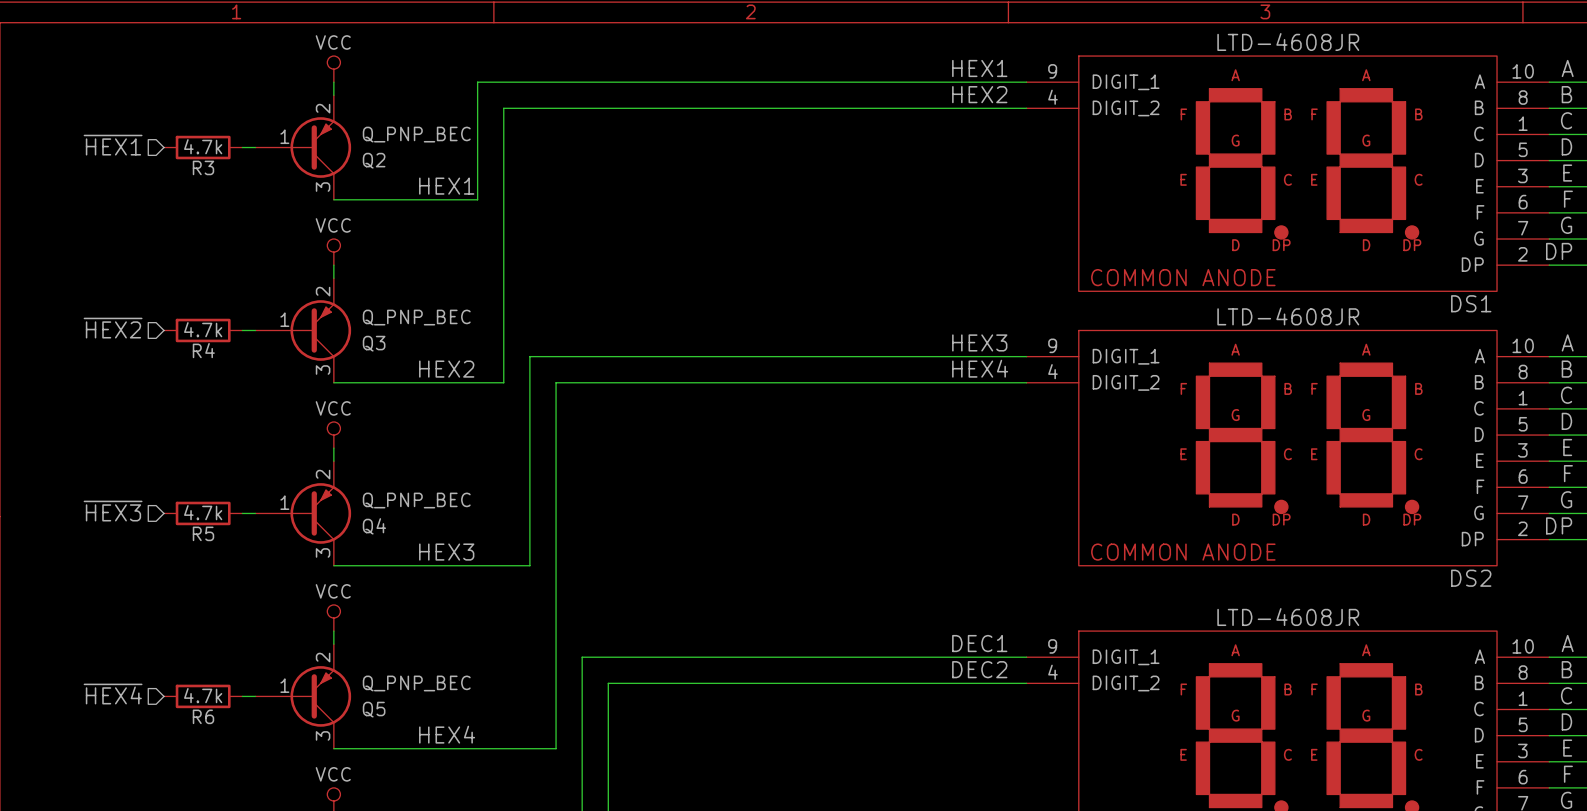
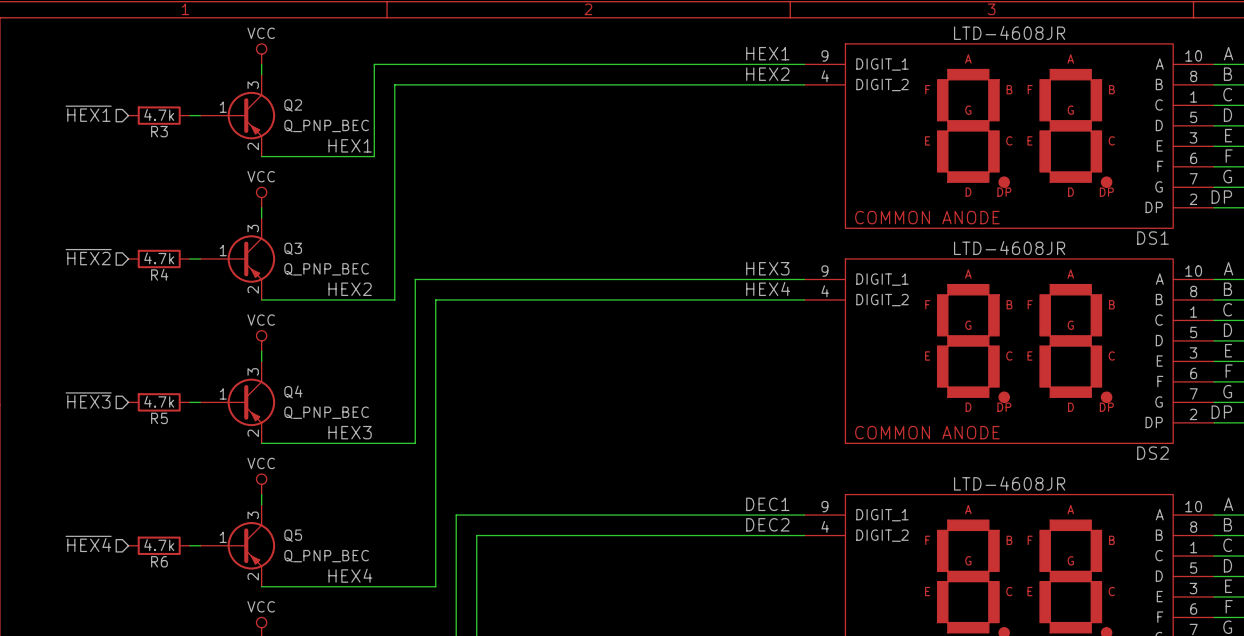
Q2 flip: as is (320, 147) -> up-down (251, 115)
Q3 flip: as is (320, 330) -> up-down (251, 259)
Q4 flip: as is (320, 513) -> up-down (251, 402)
Q5 flip: as is (320, 696) -> up-down (251, 545)

